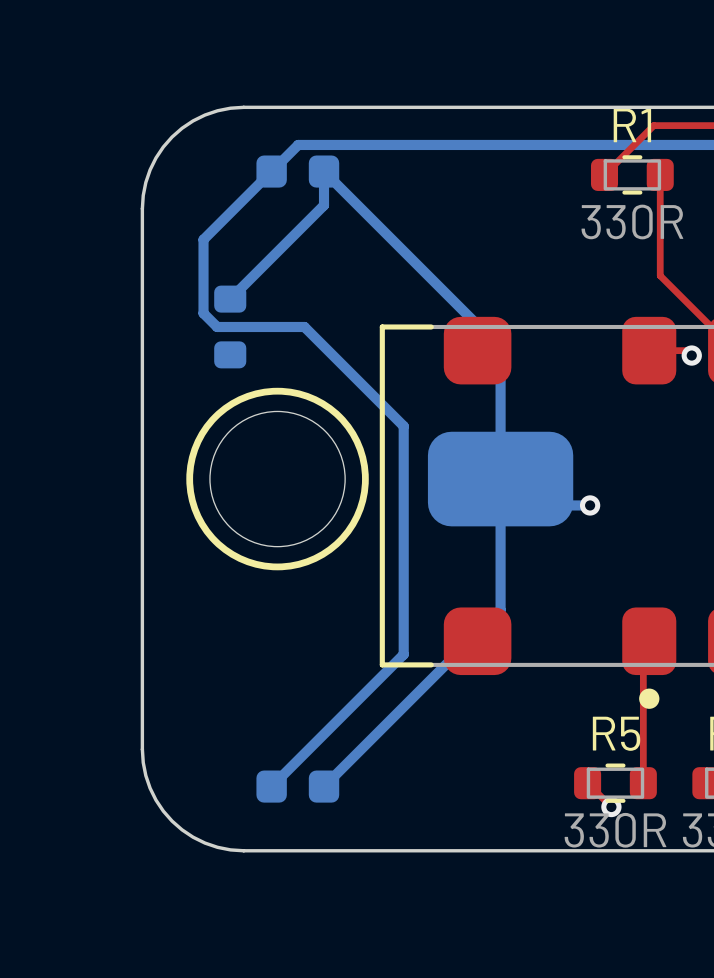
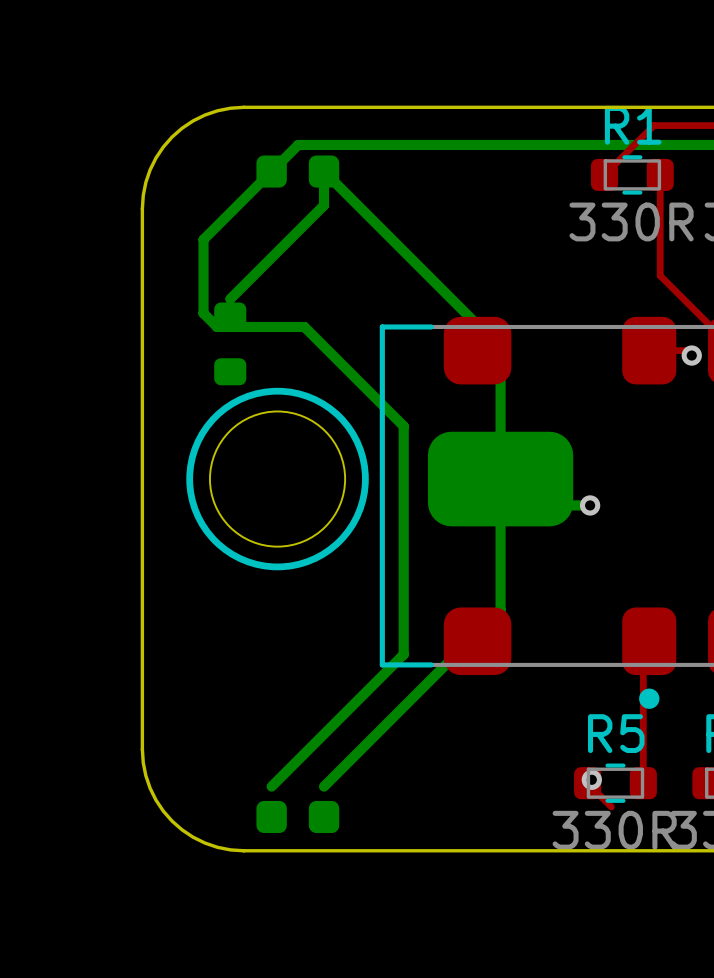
part position: (230, 326) -> (230, 343)
part position: (297, 786) -> (297, 816)
via position: (611, 807) -> (591, 779)

